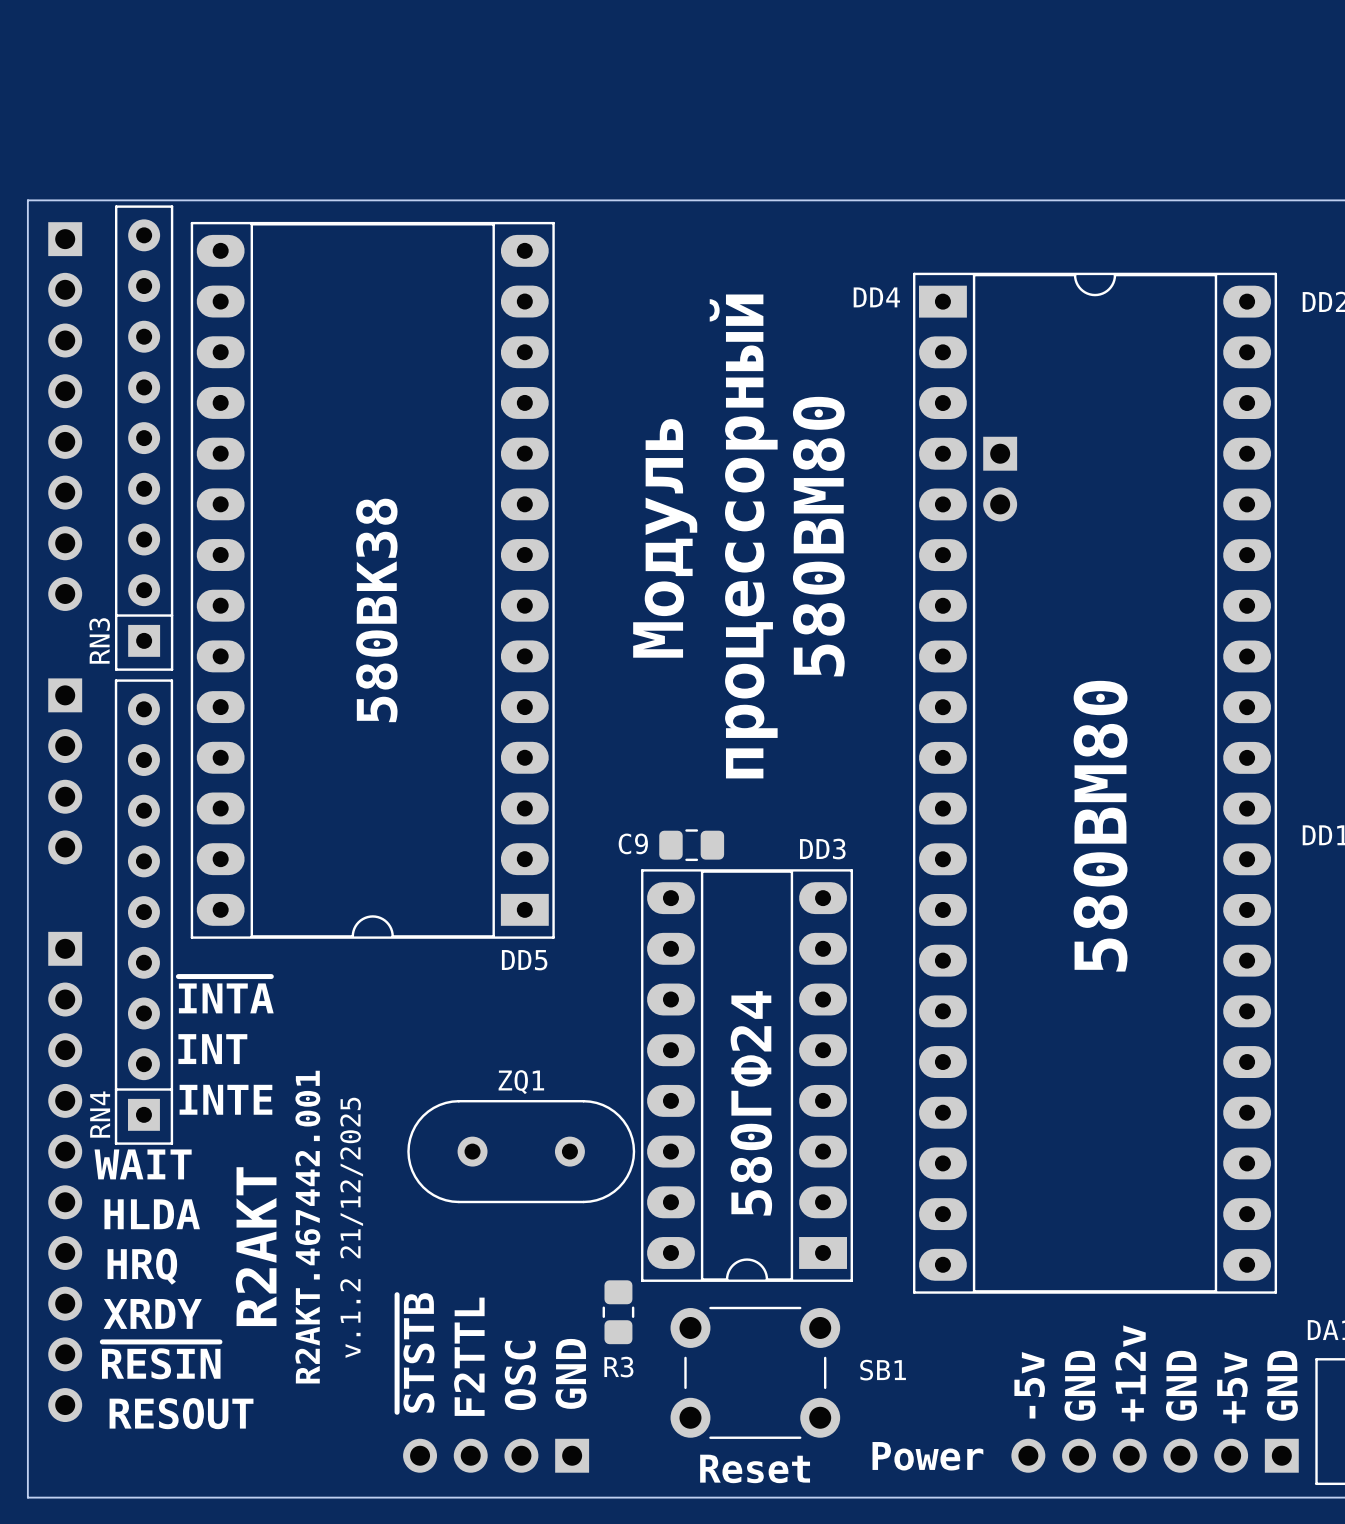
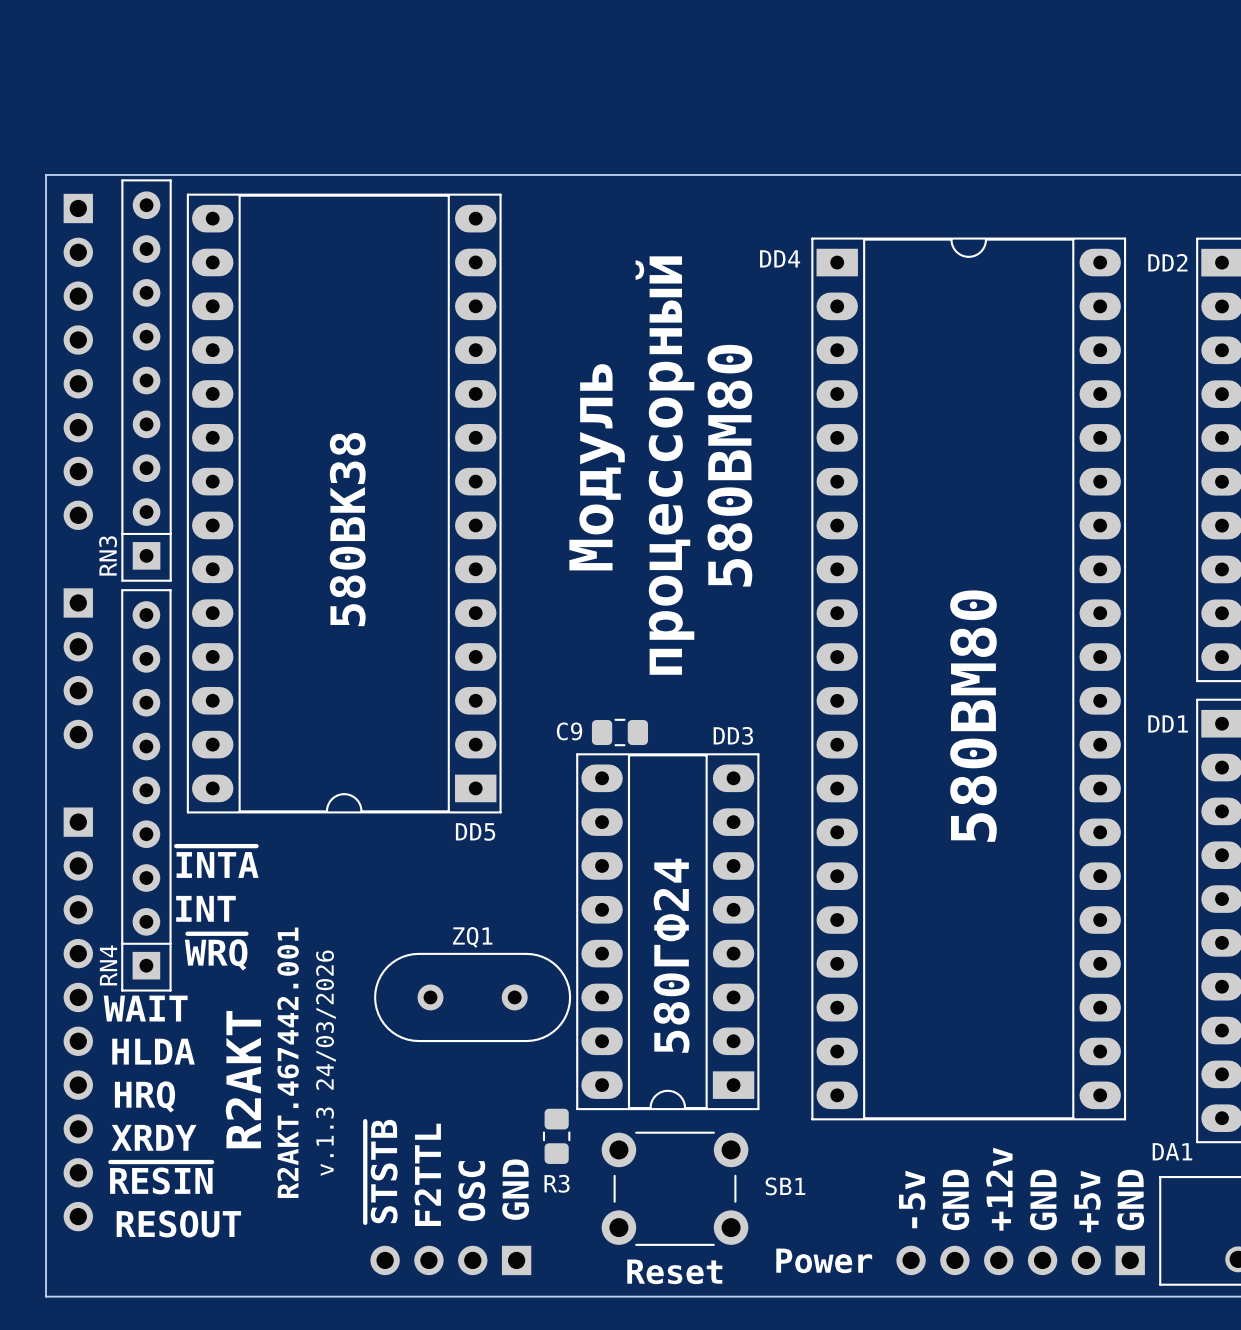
part: (1000, 479) -> none
text: INTE (225, 1099) -> ~{WRQ} (216, 952)
text: v.1.2 21/12/2025 (351, 1227) -> v.1.3 24/03/2026 (325, 1063)

